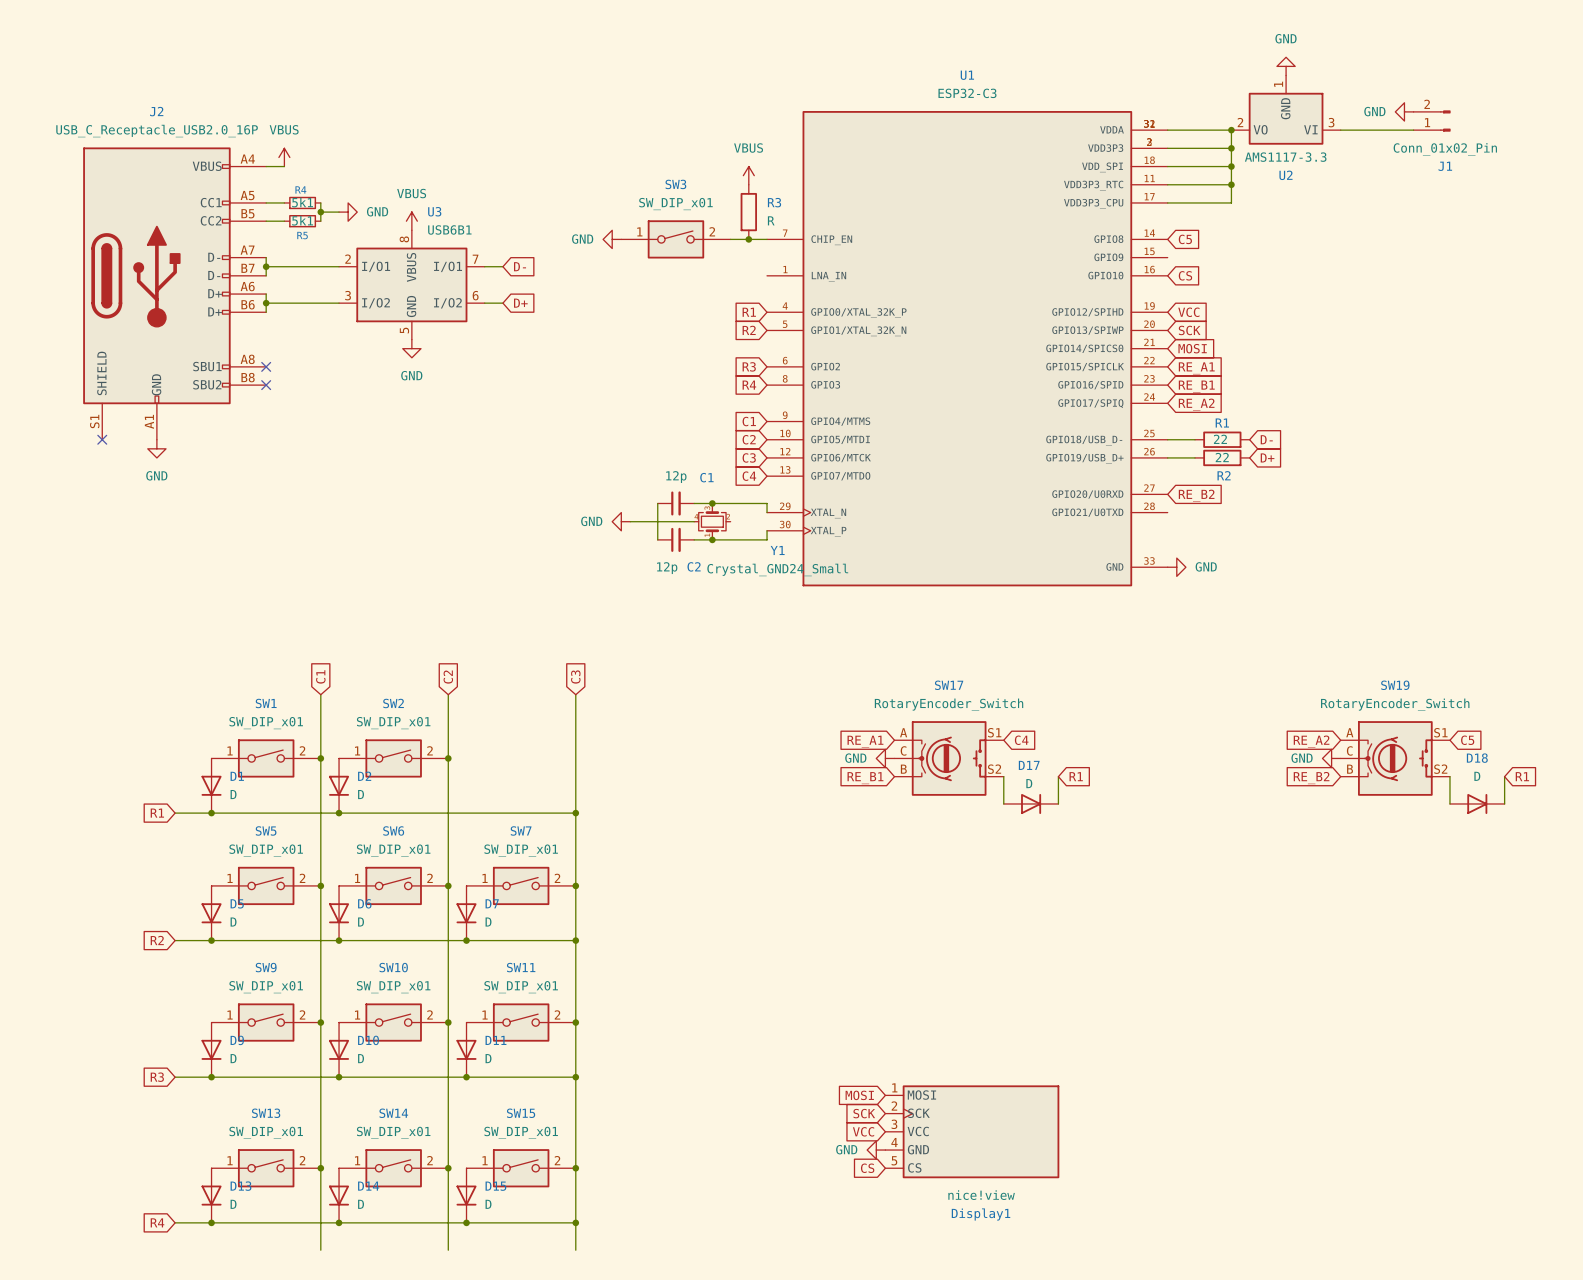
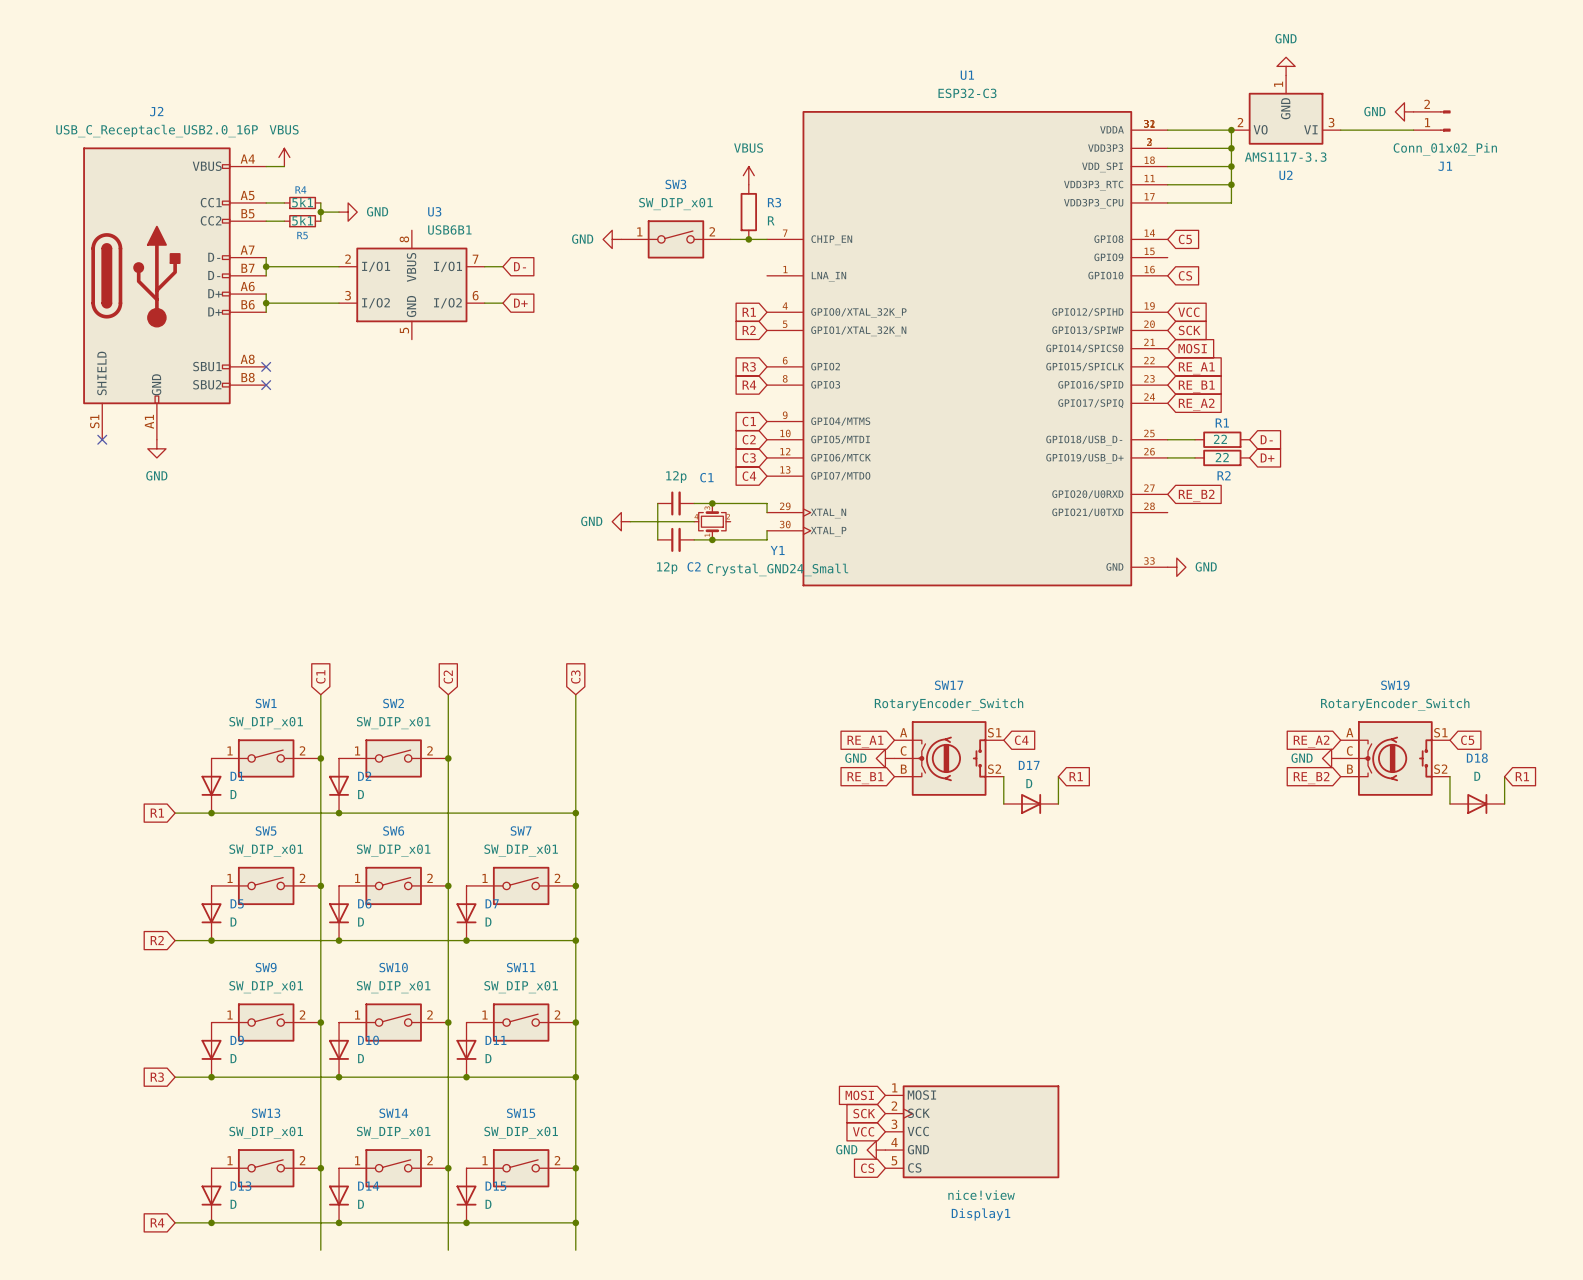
power symbol: VBUS (411, 221) -> none
power symbol: GND (411, 348) -> none

